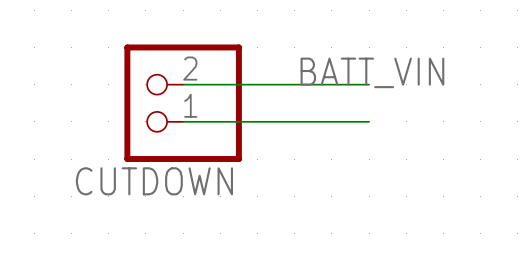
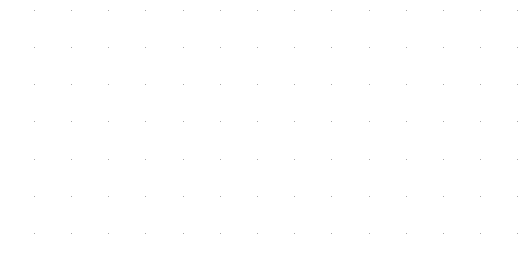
label: BATT_VIN (372, 72) -> none
wire: (183, 84) (369, 84) -> none
CUTDOWN: (183, 103) -> none
wire: (183, 121) (369, 121) -> none

